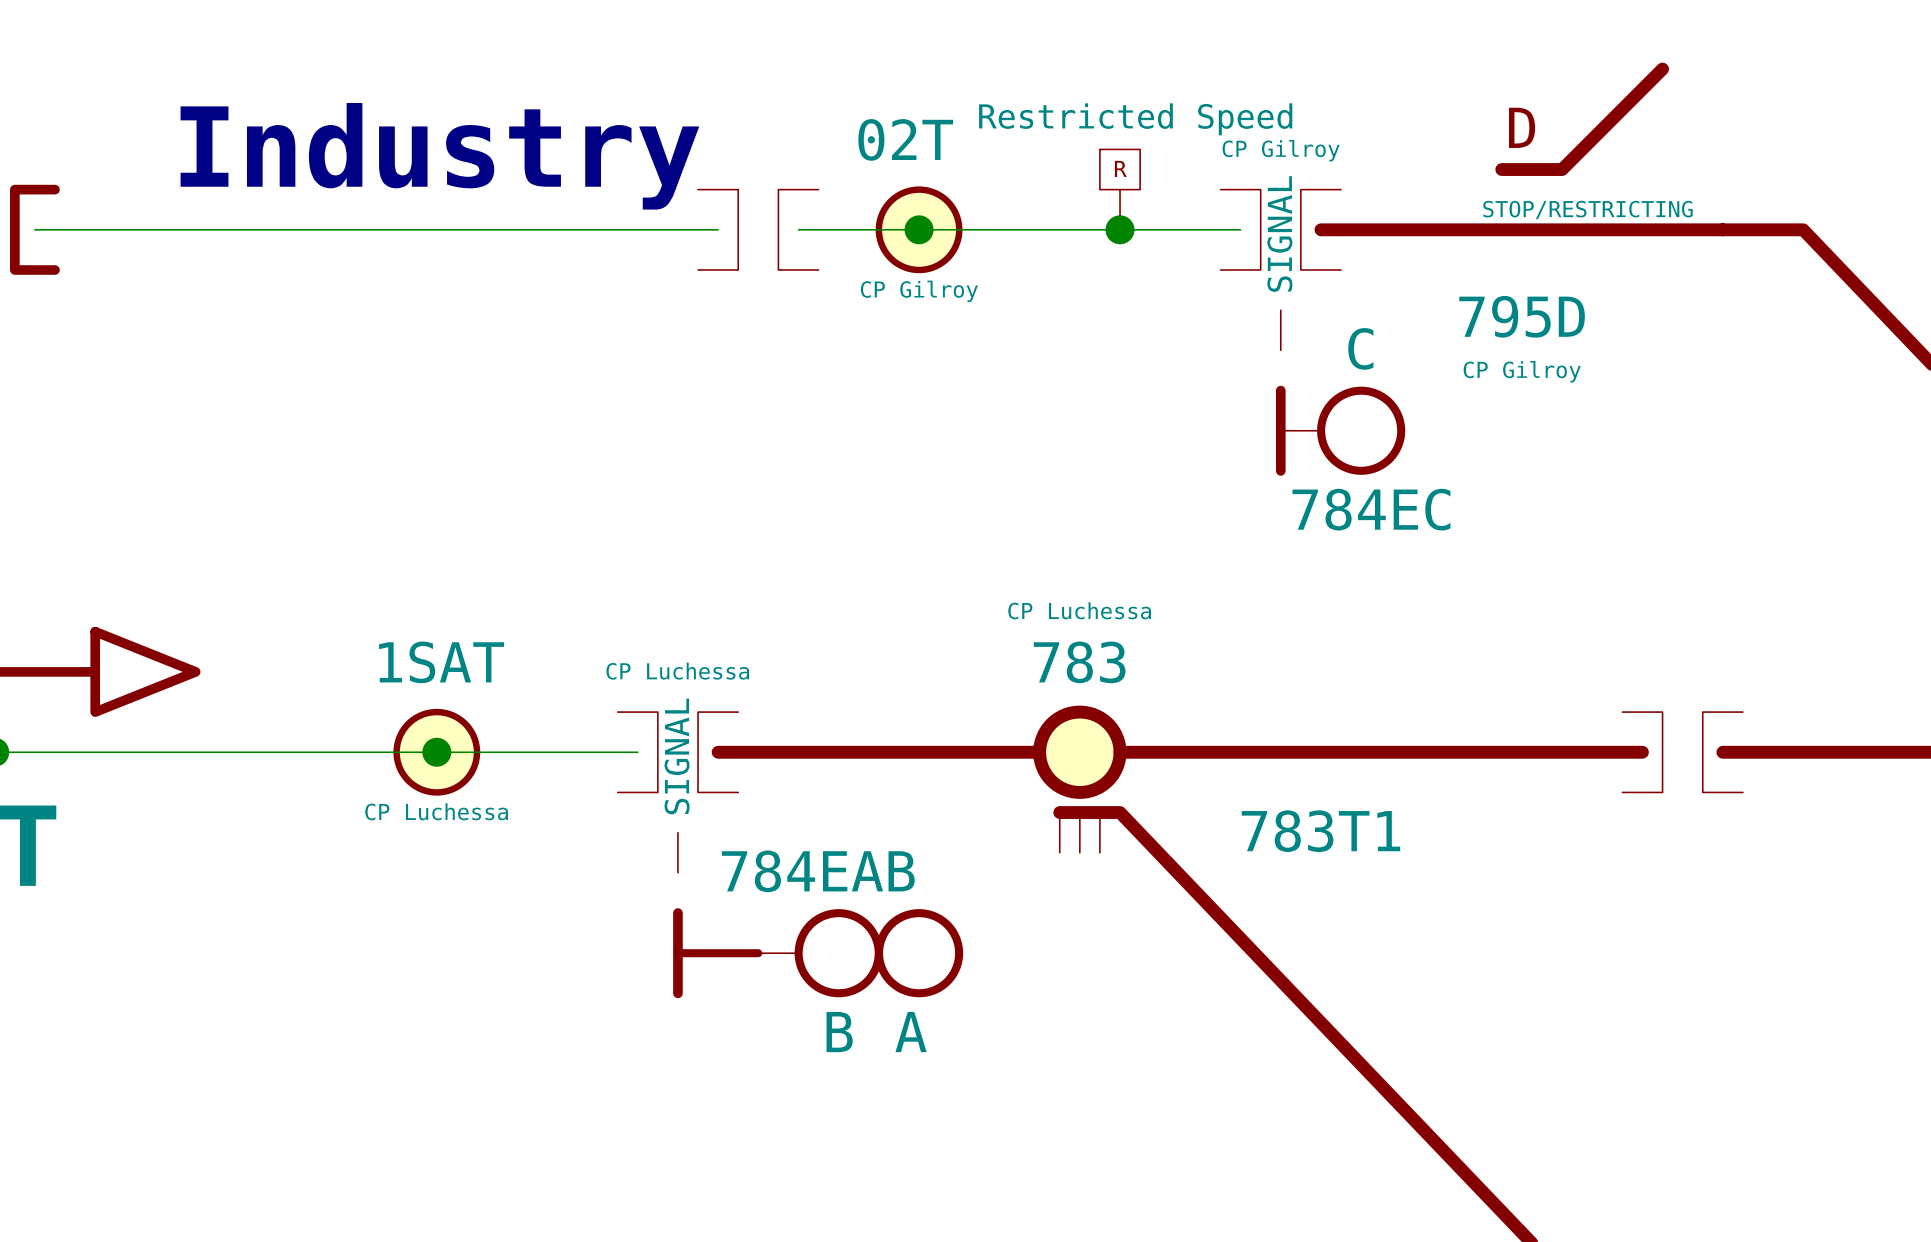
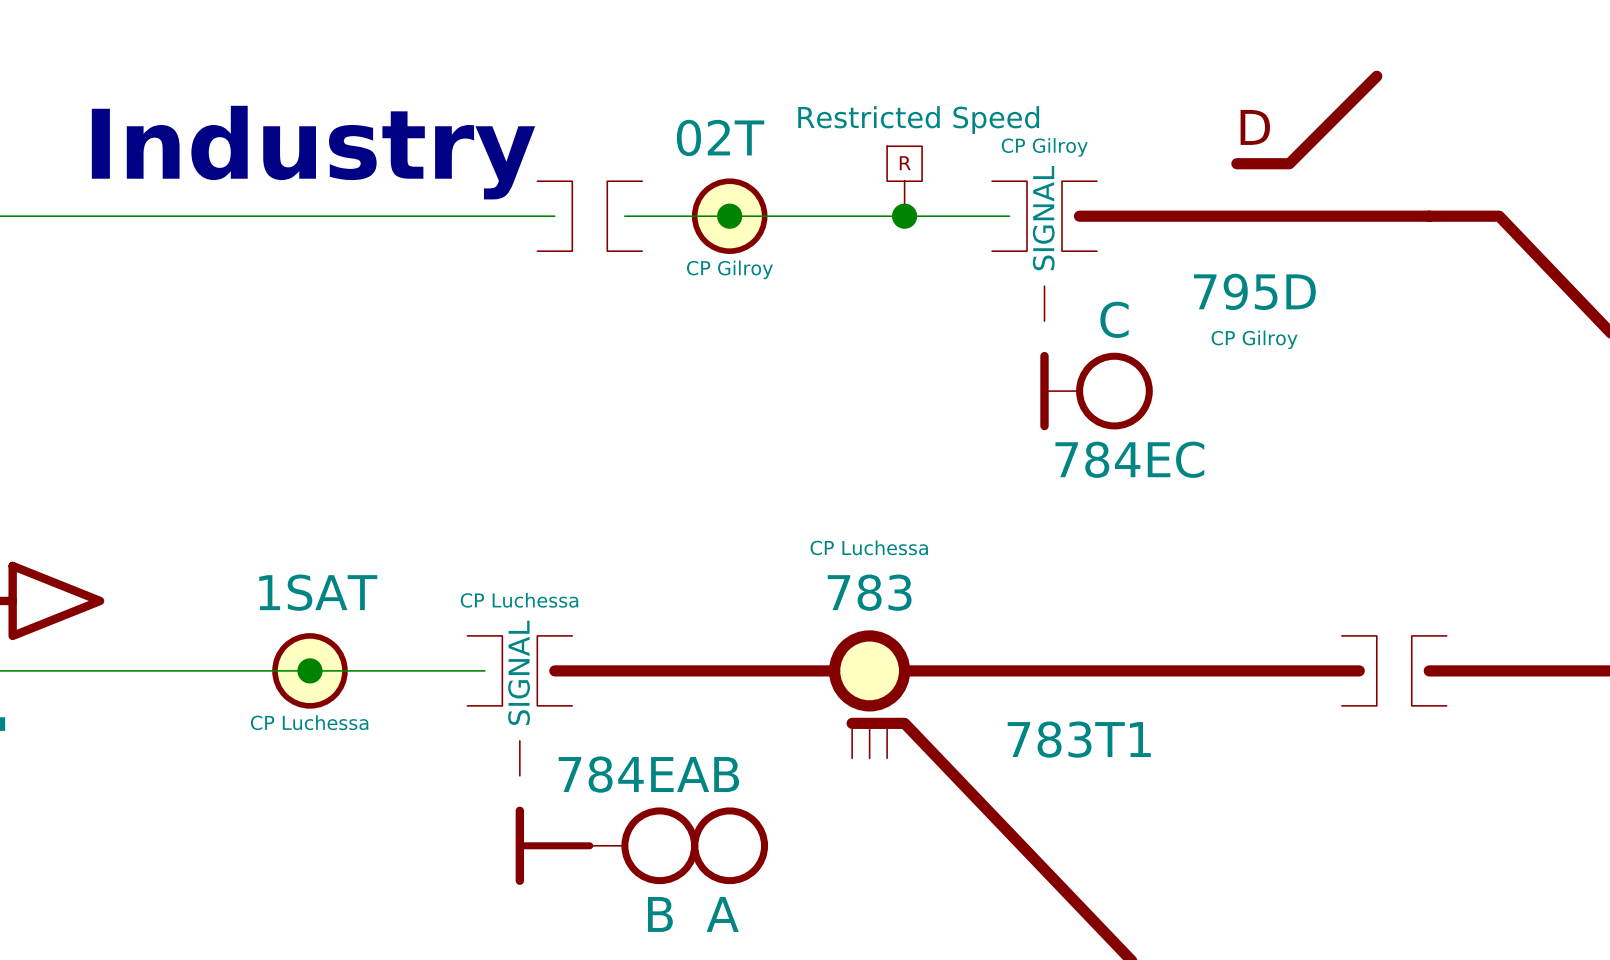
part text: STOP/RESTRICTING (1587, 209) -> none

